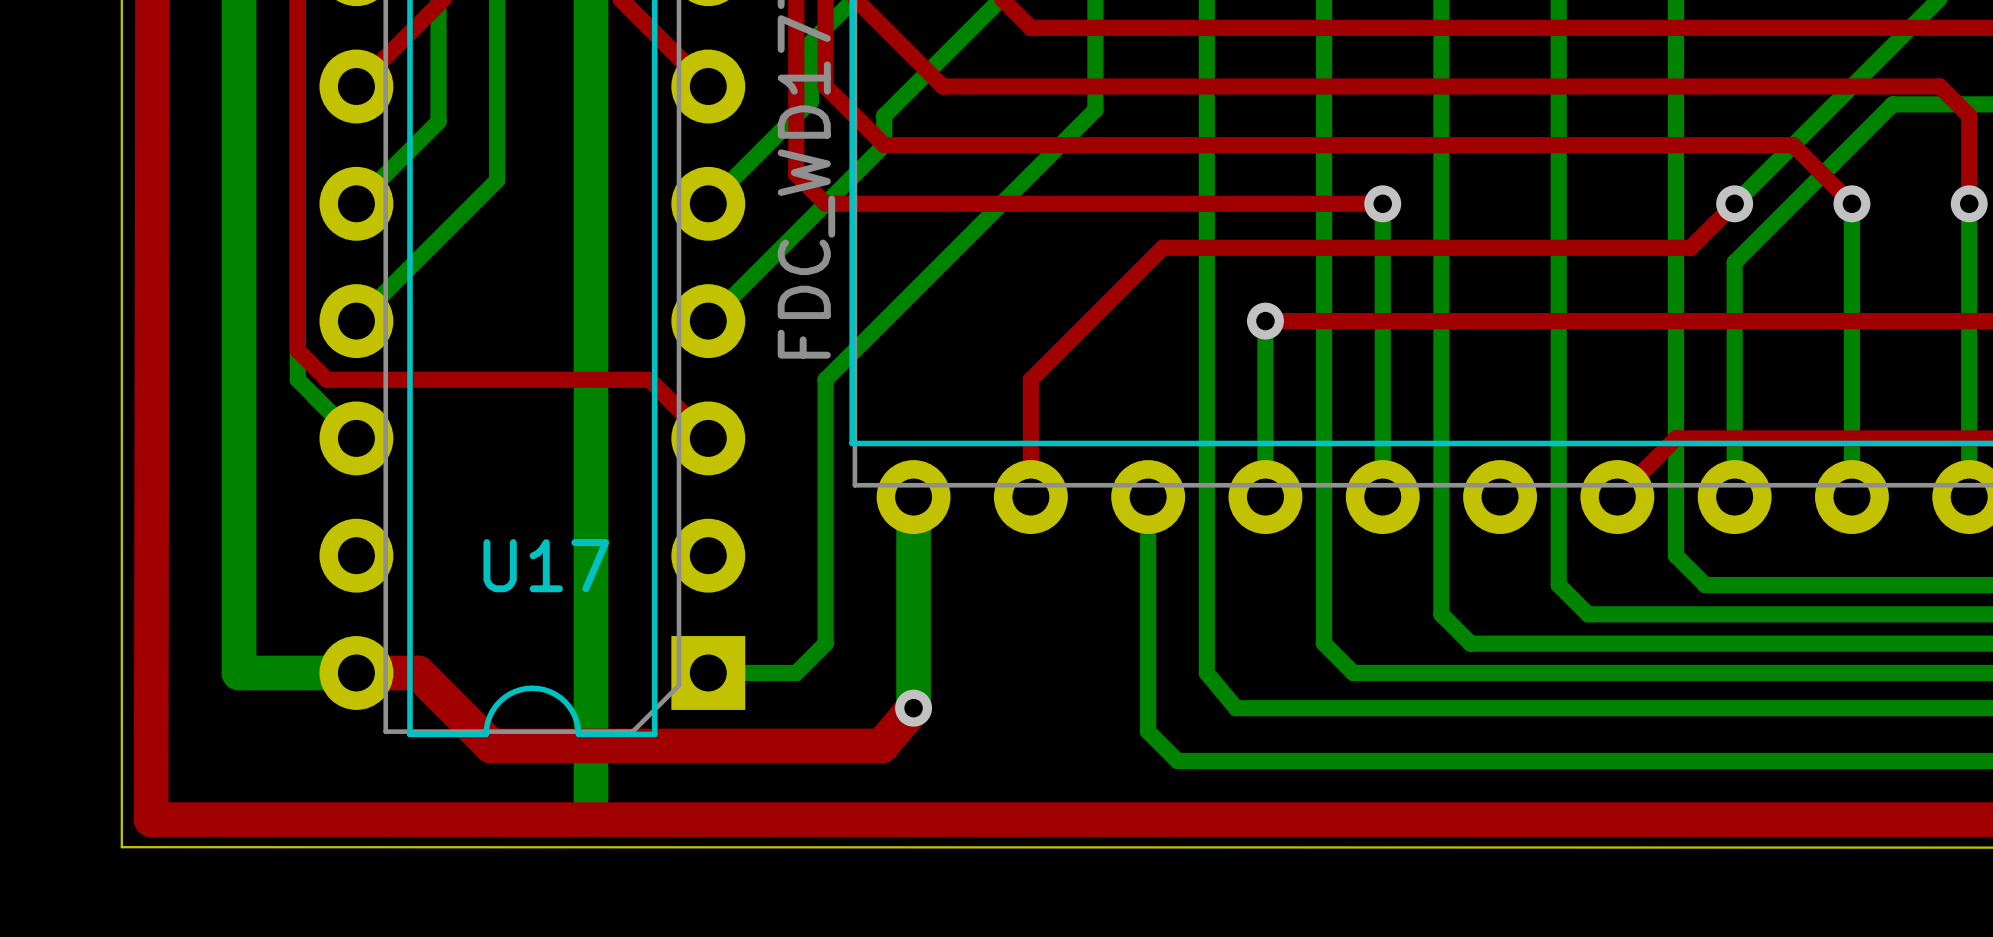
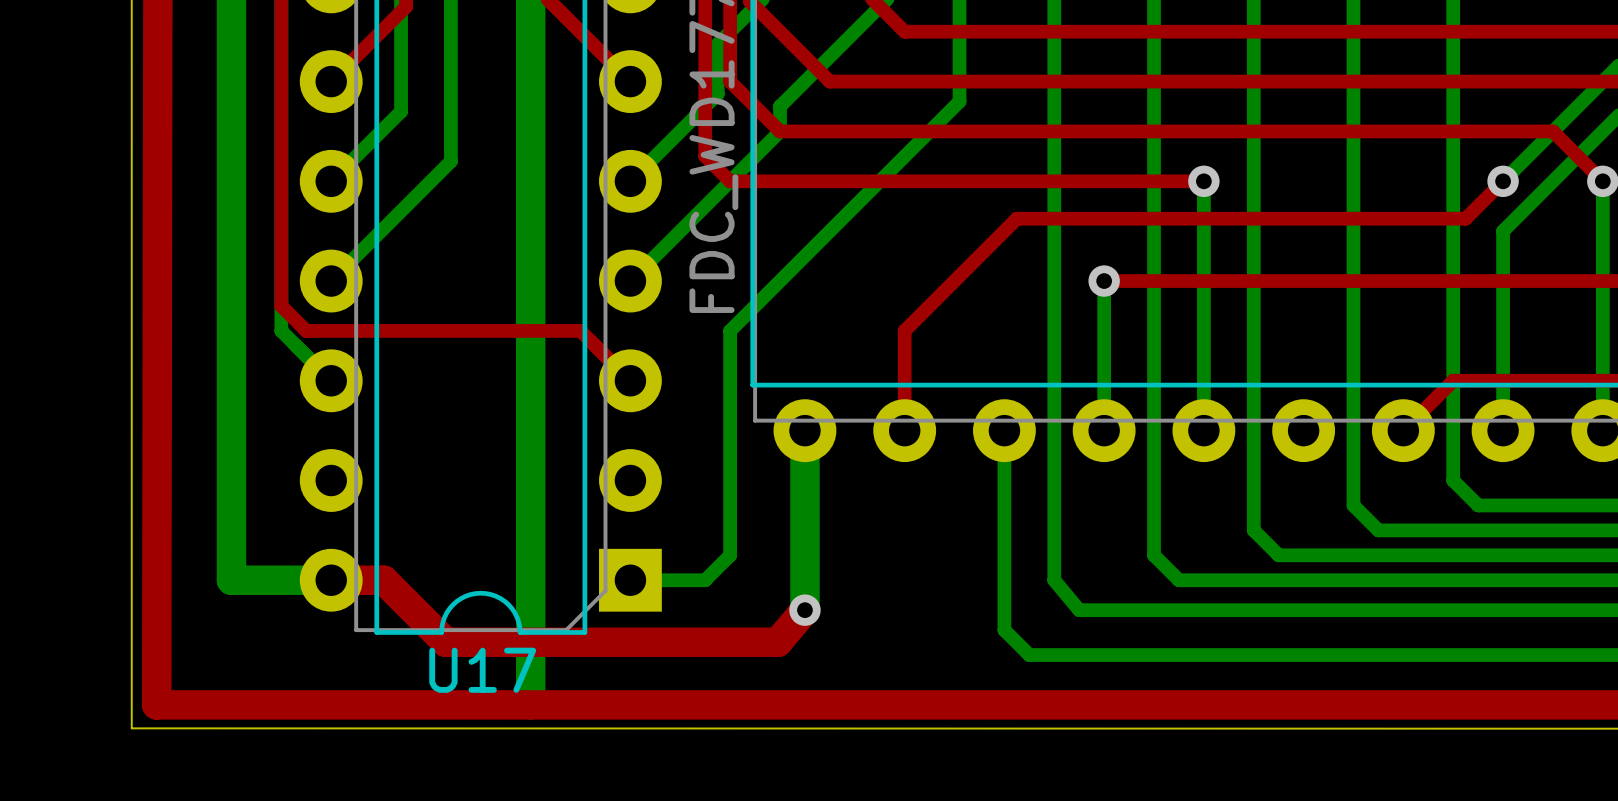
U17 name position: U17 (546, 565) -> U17 (482, 670)

